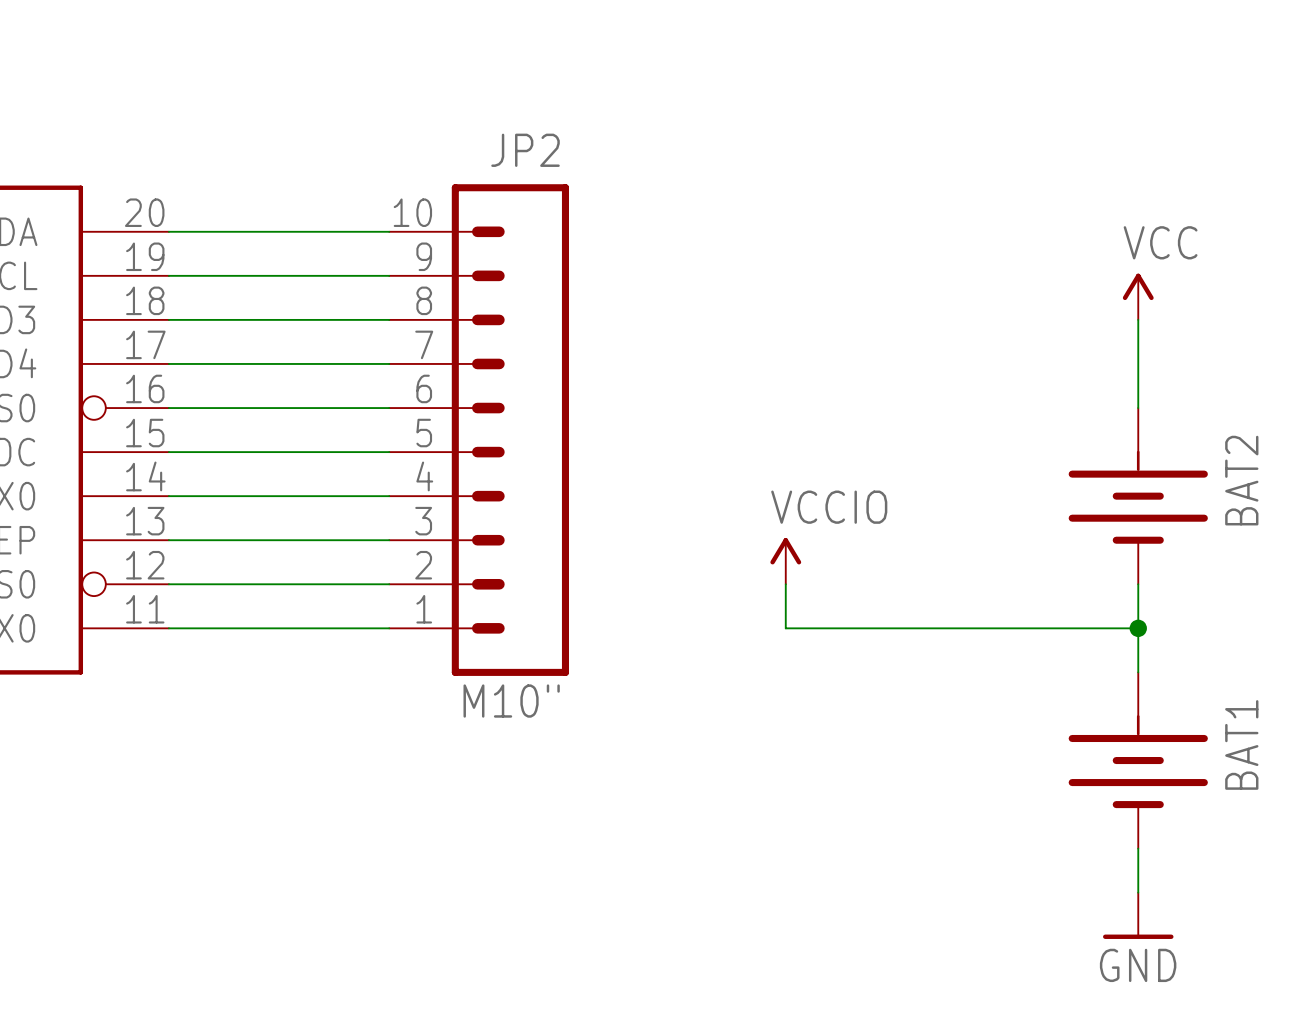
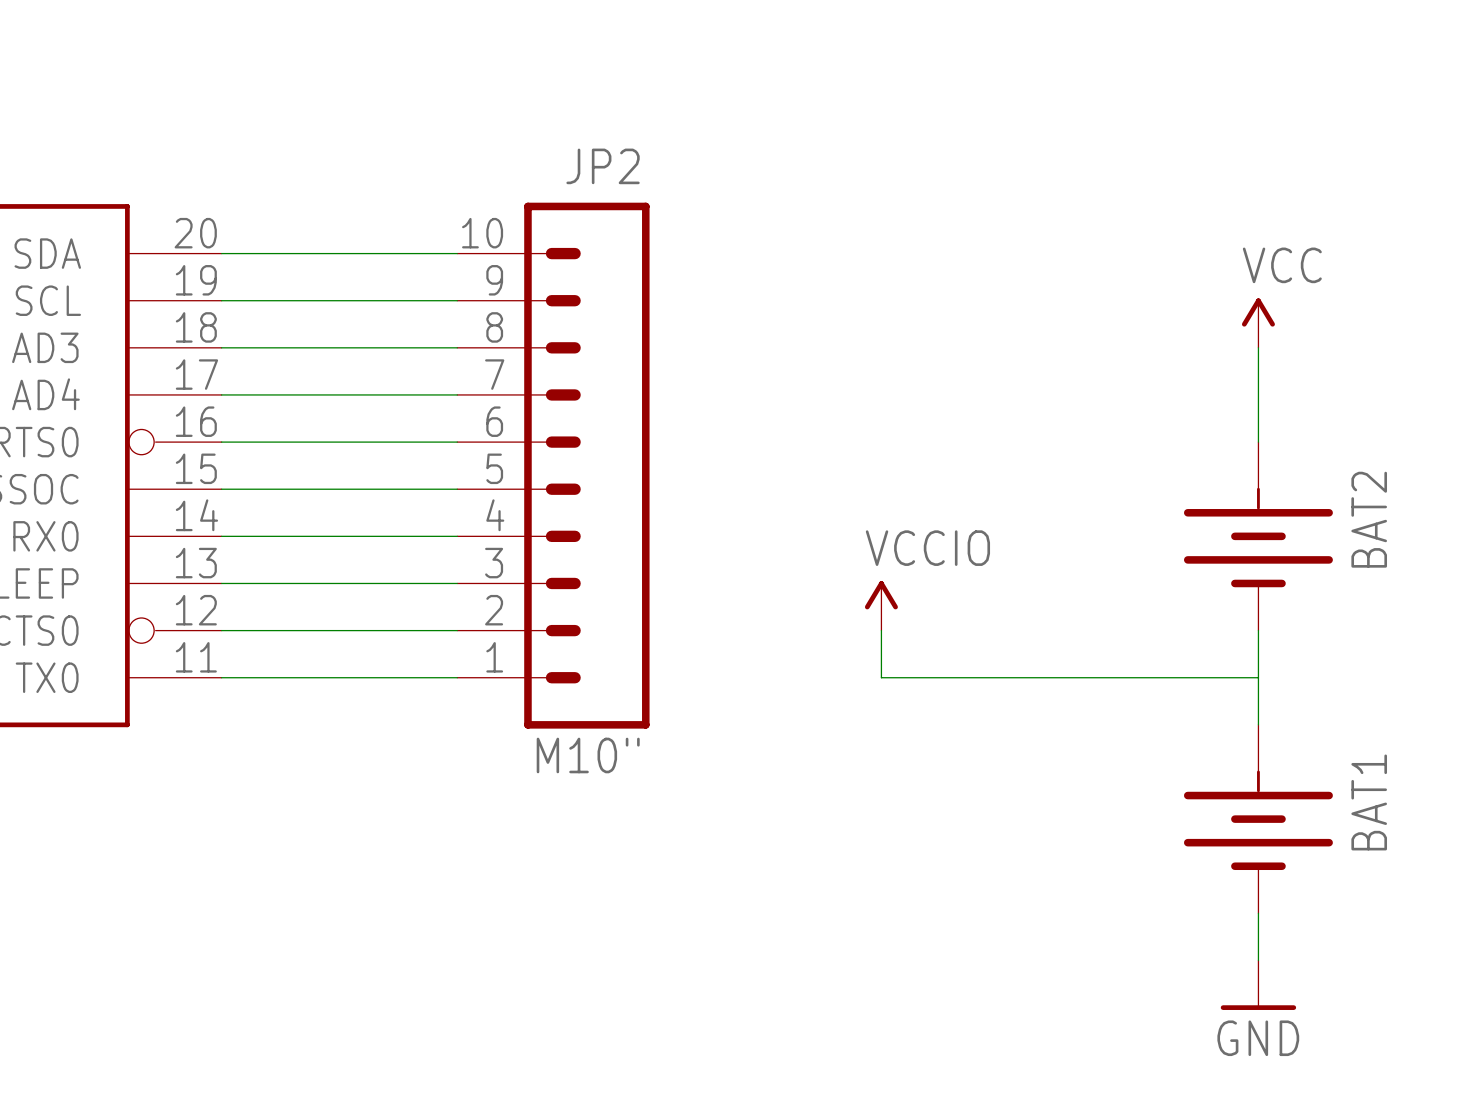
junction: (1138, 628) -> none

